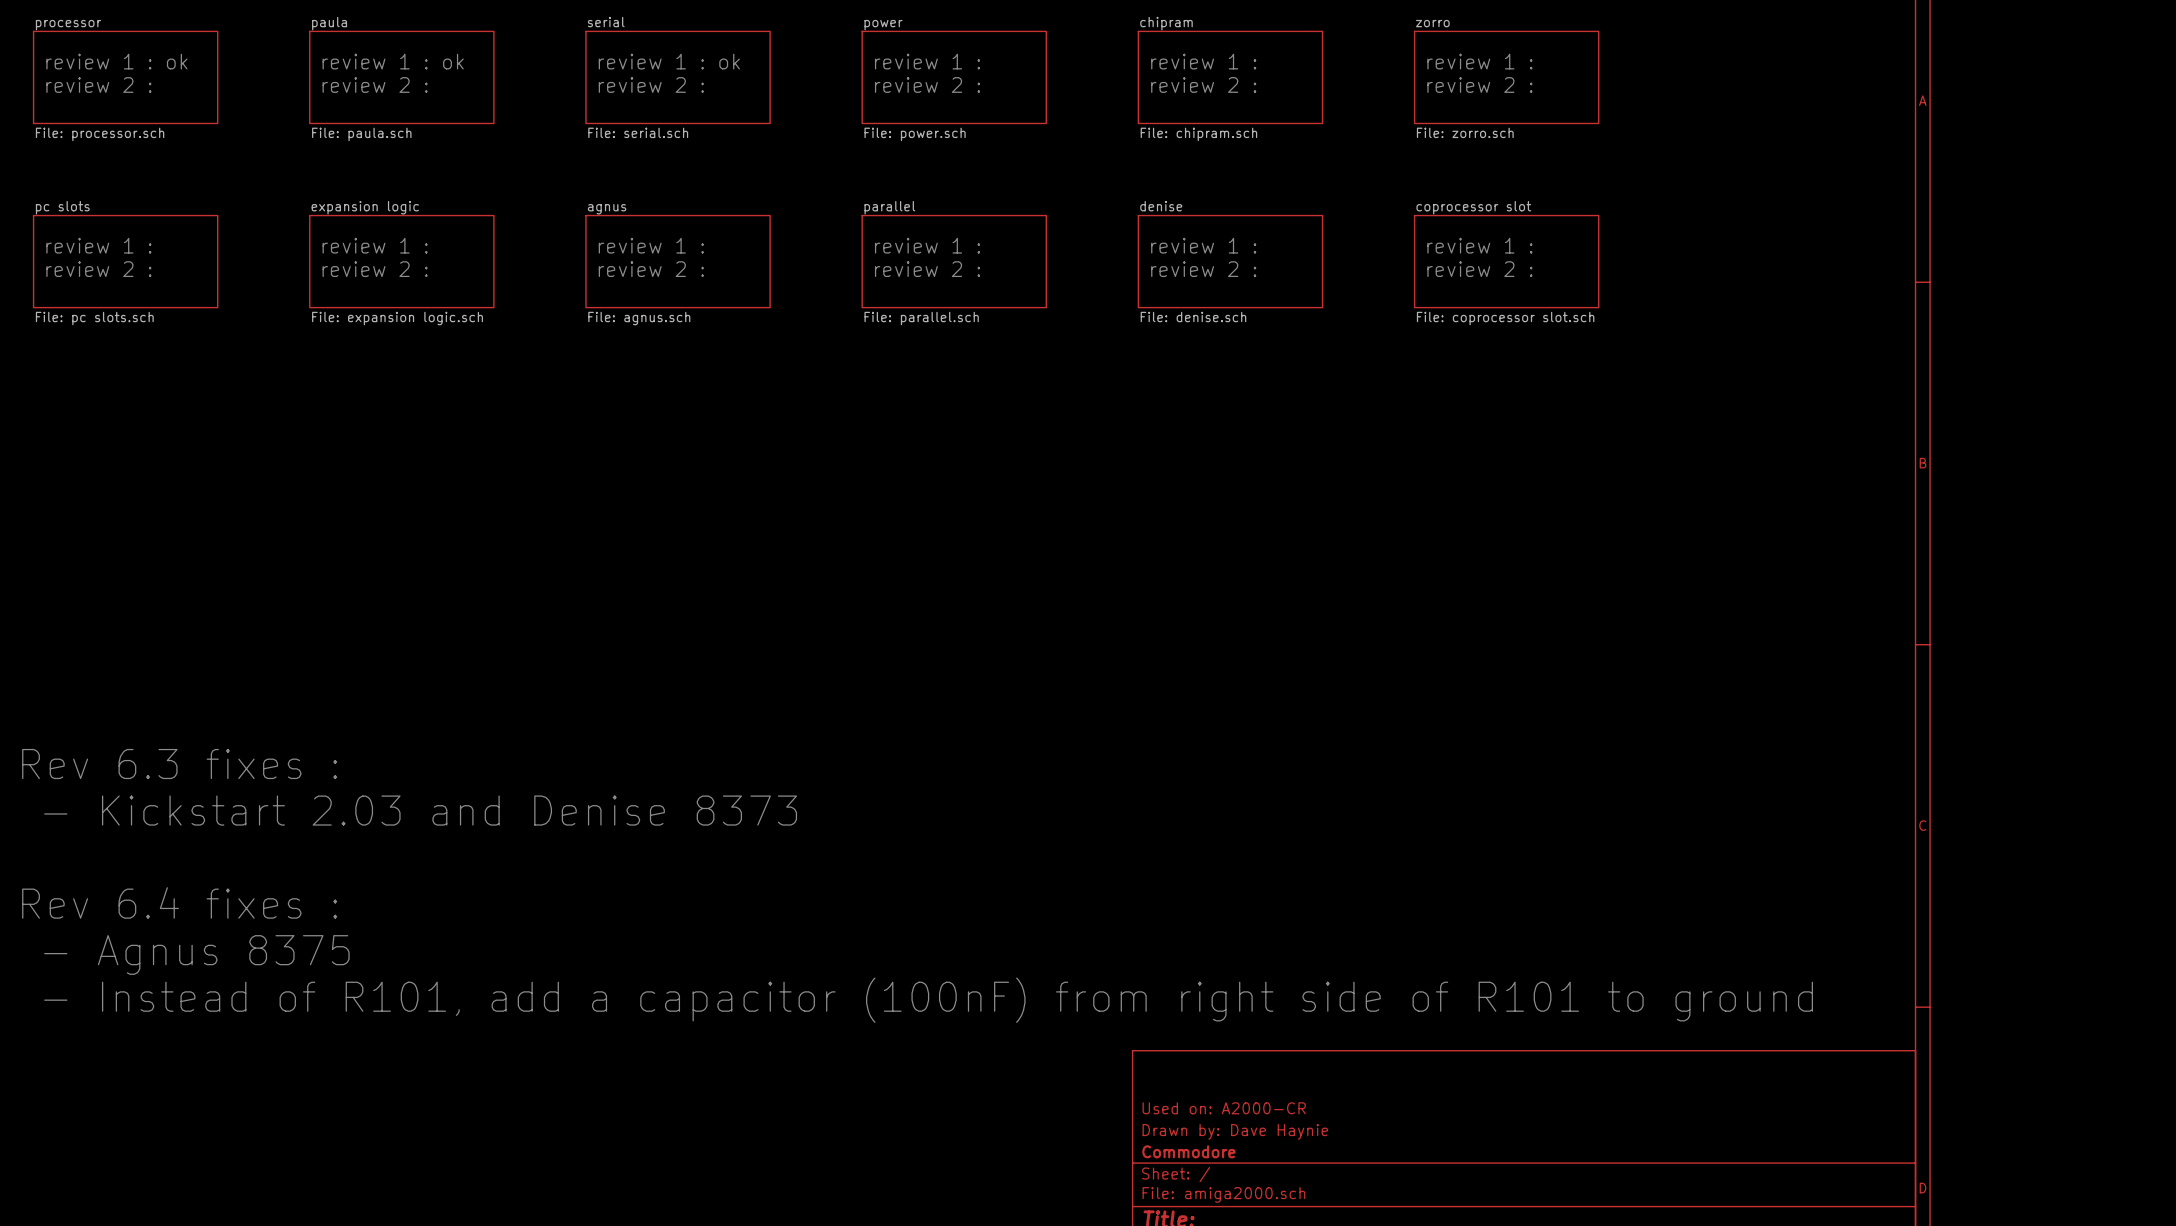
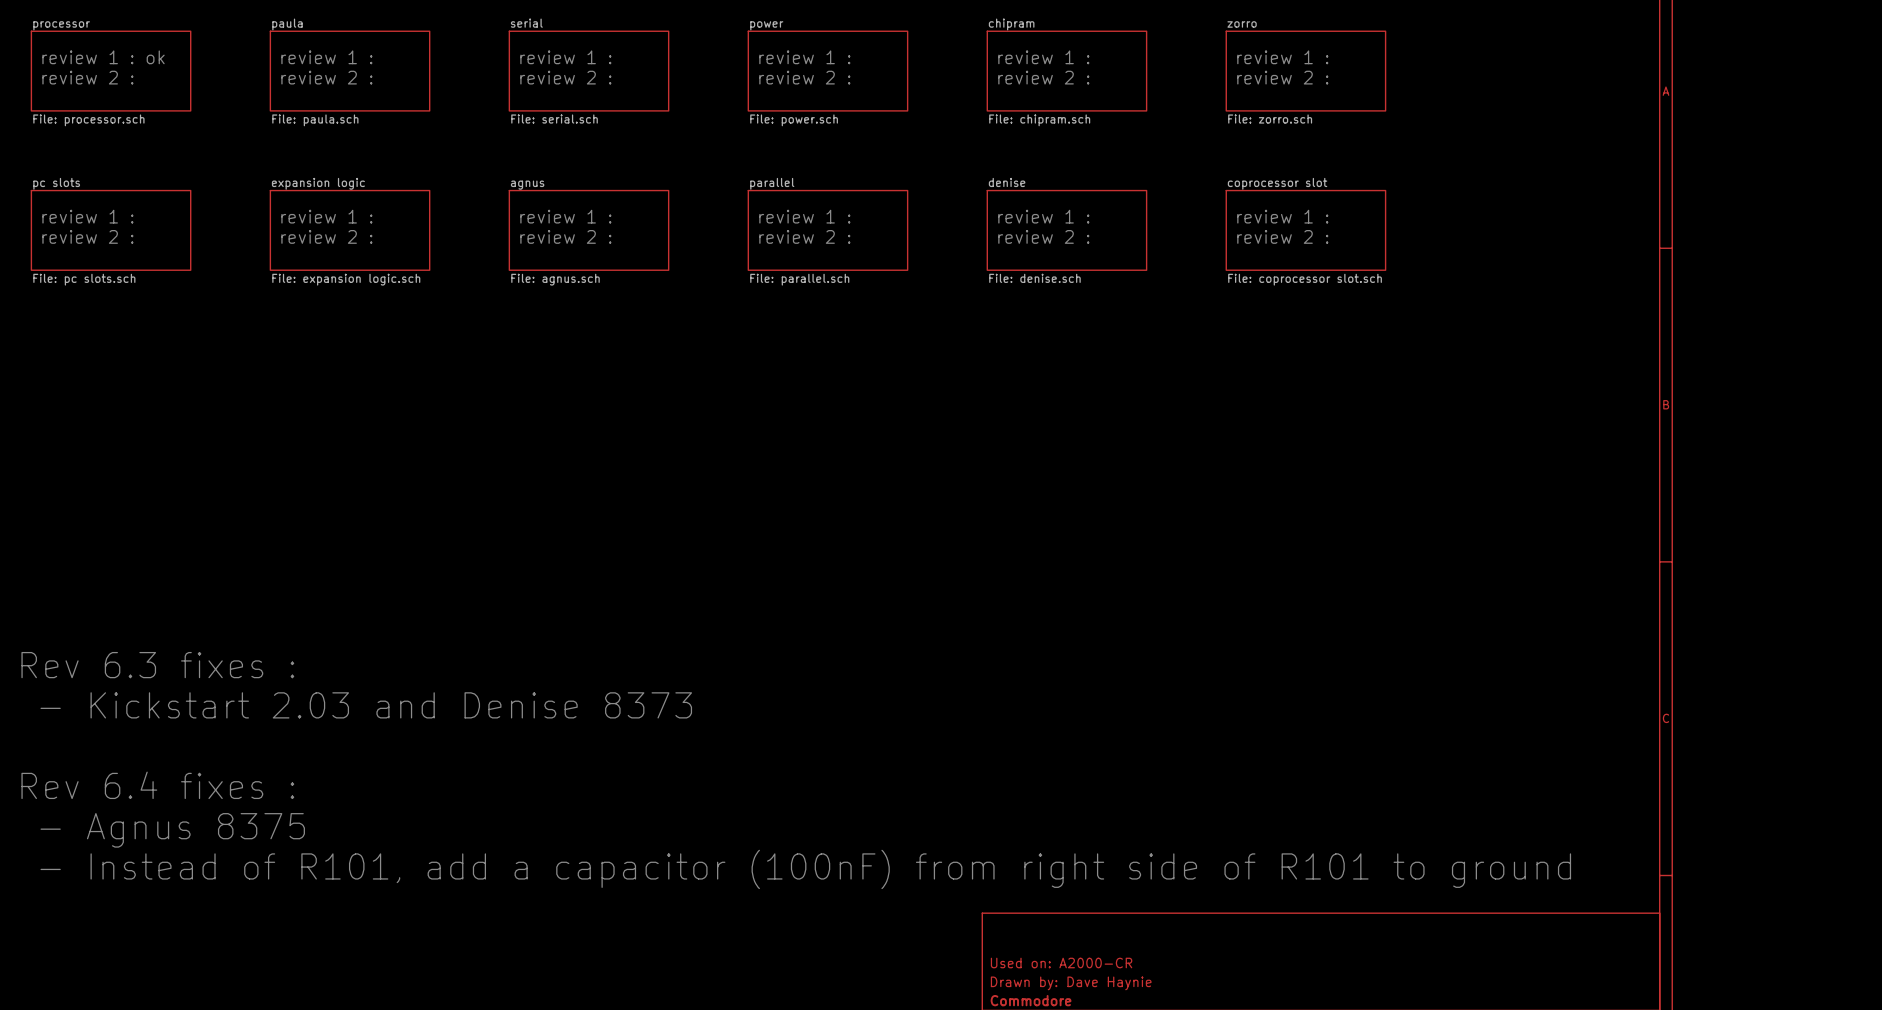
text: review 1 : ok (393, 61) -> review 1 : (326, 57)
text: review 1 : ok (669, 61) -> review 1 : (565, 57)

